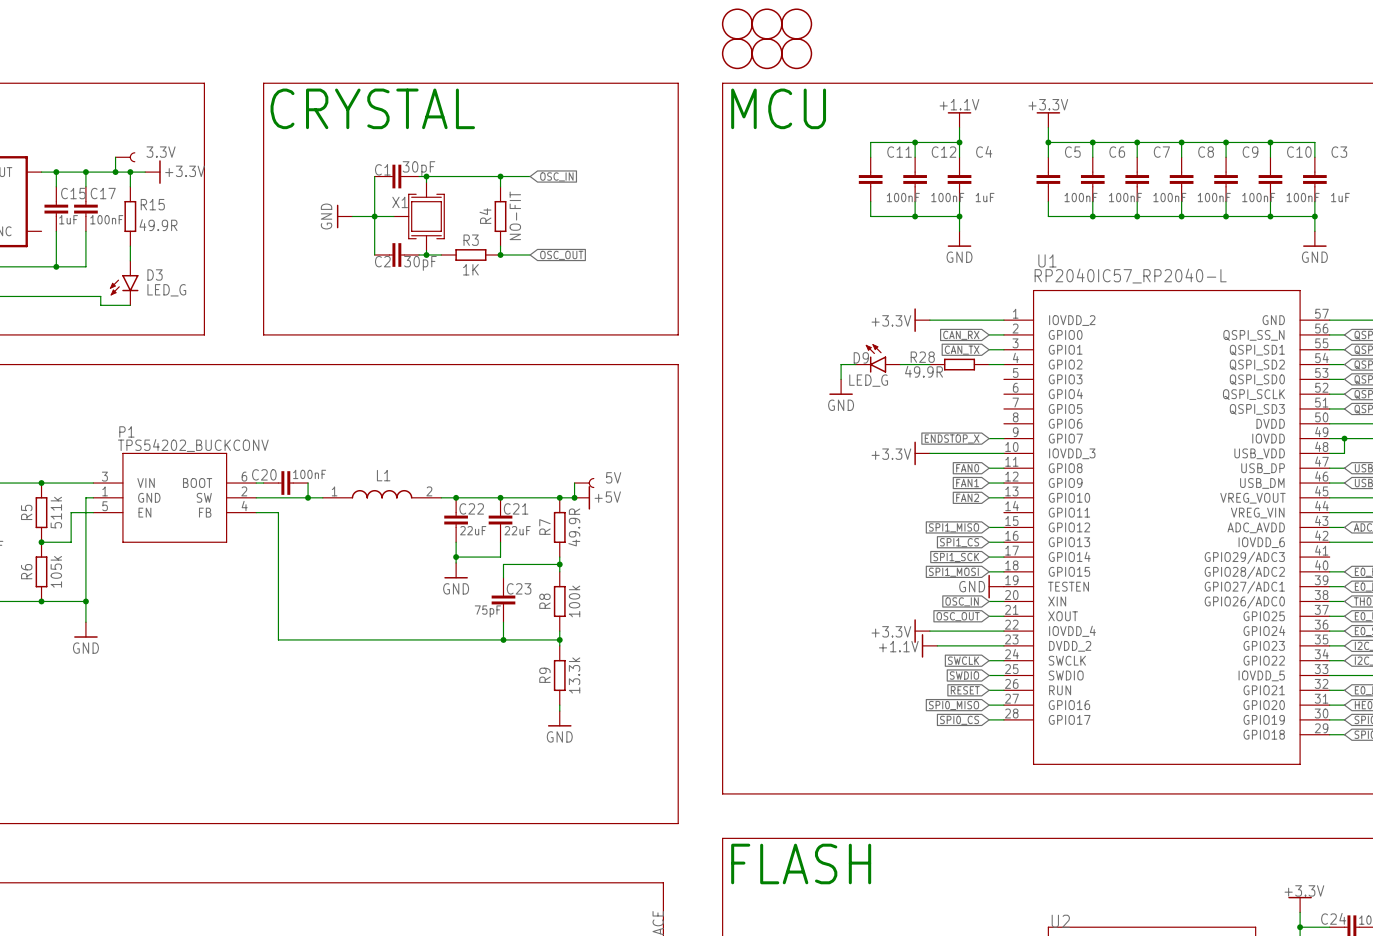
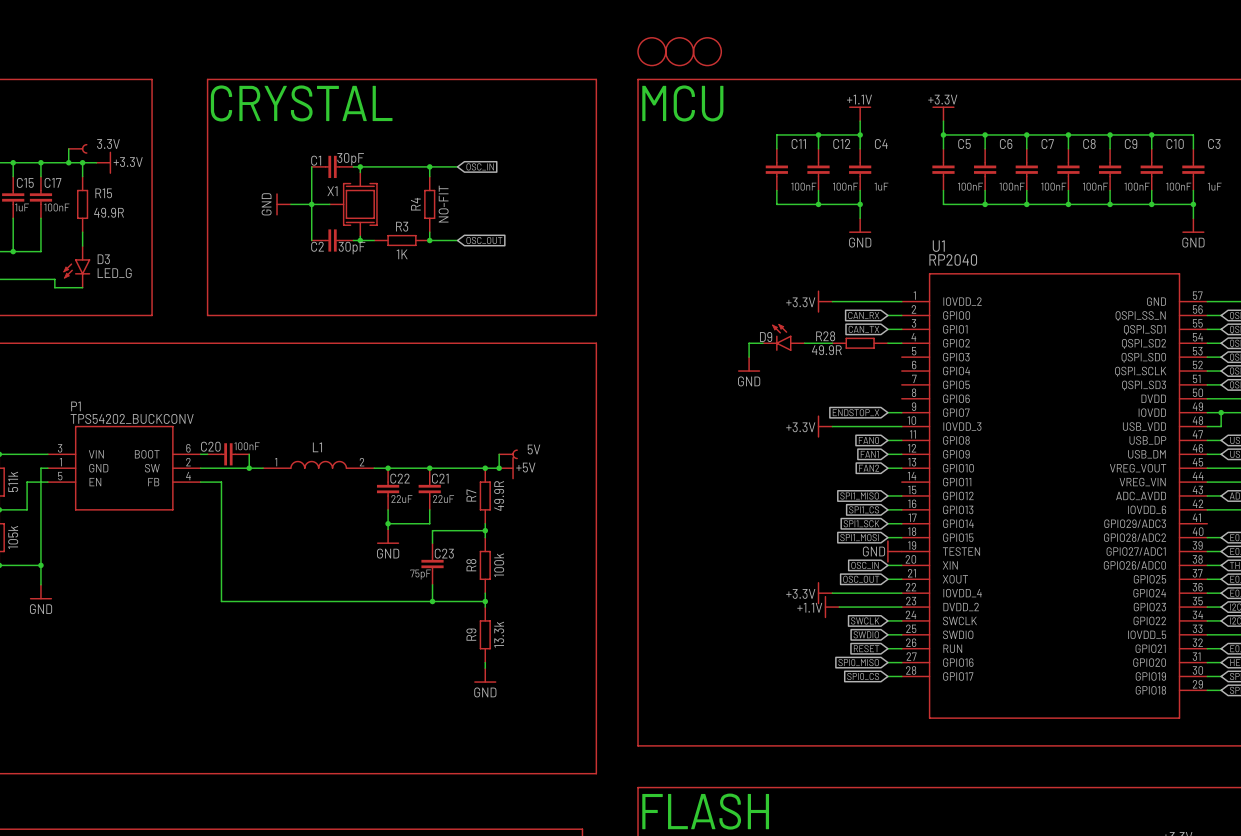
part: (737, 24) -> none
part: (767, 24) -> none
part: (796, 24) -> none
U1 value: RP2040IC57_RP2040-L (1130, 276) -> RP2040 (953, 259)
D9 value: LED_G (868, 380) -> none

